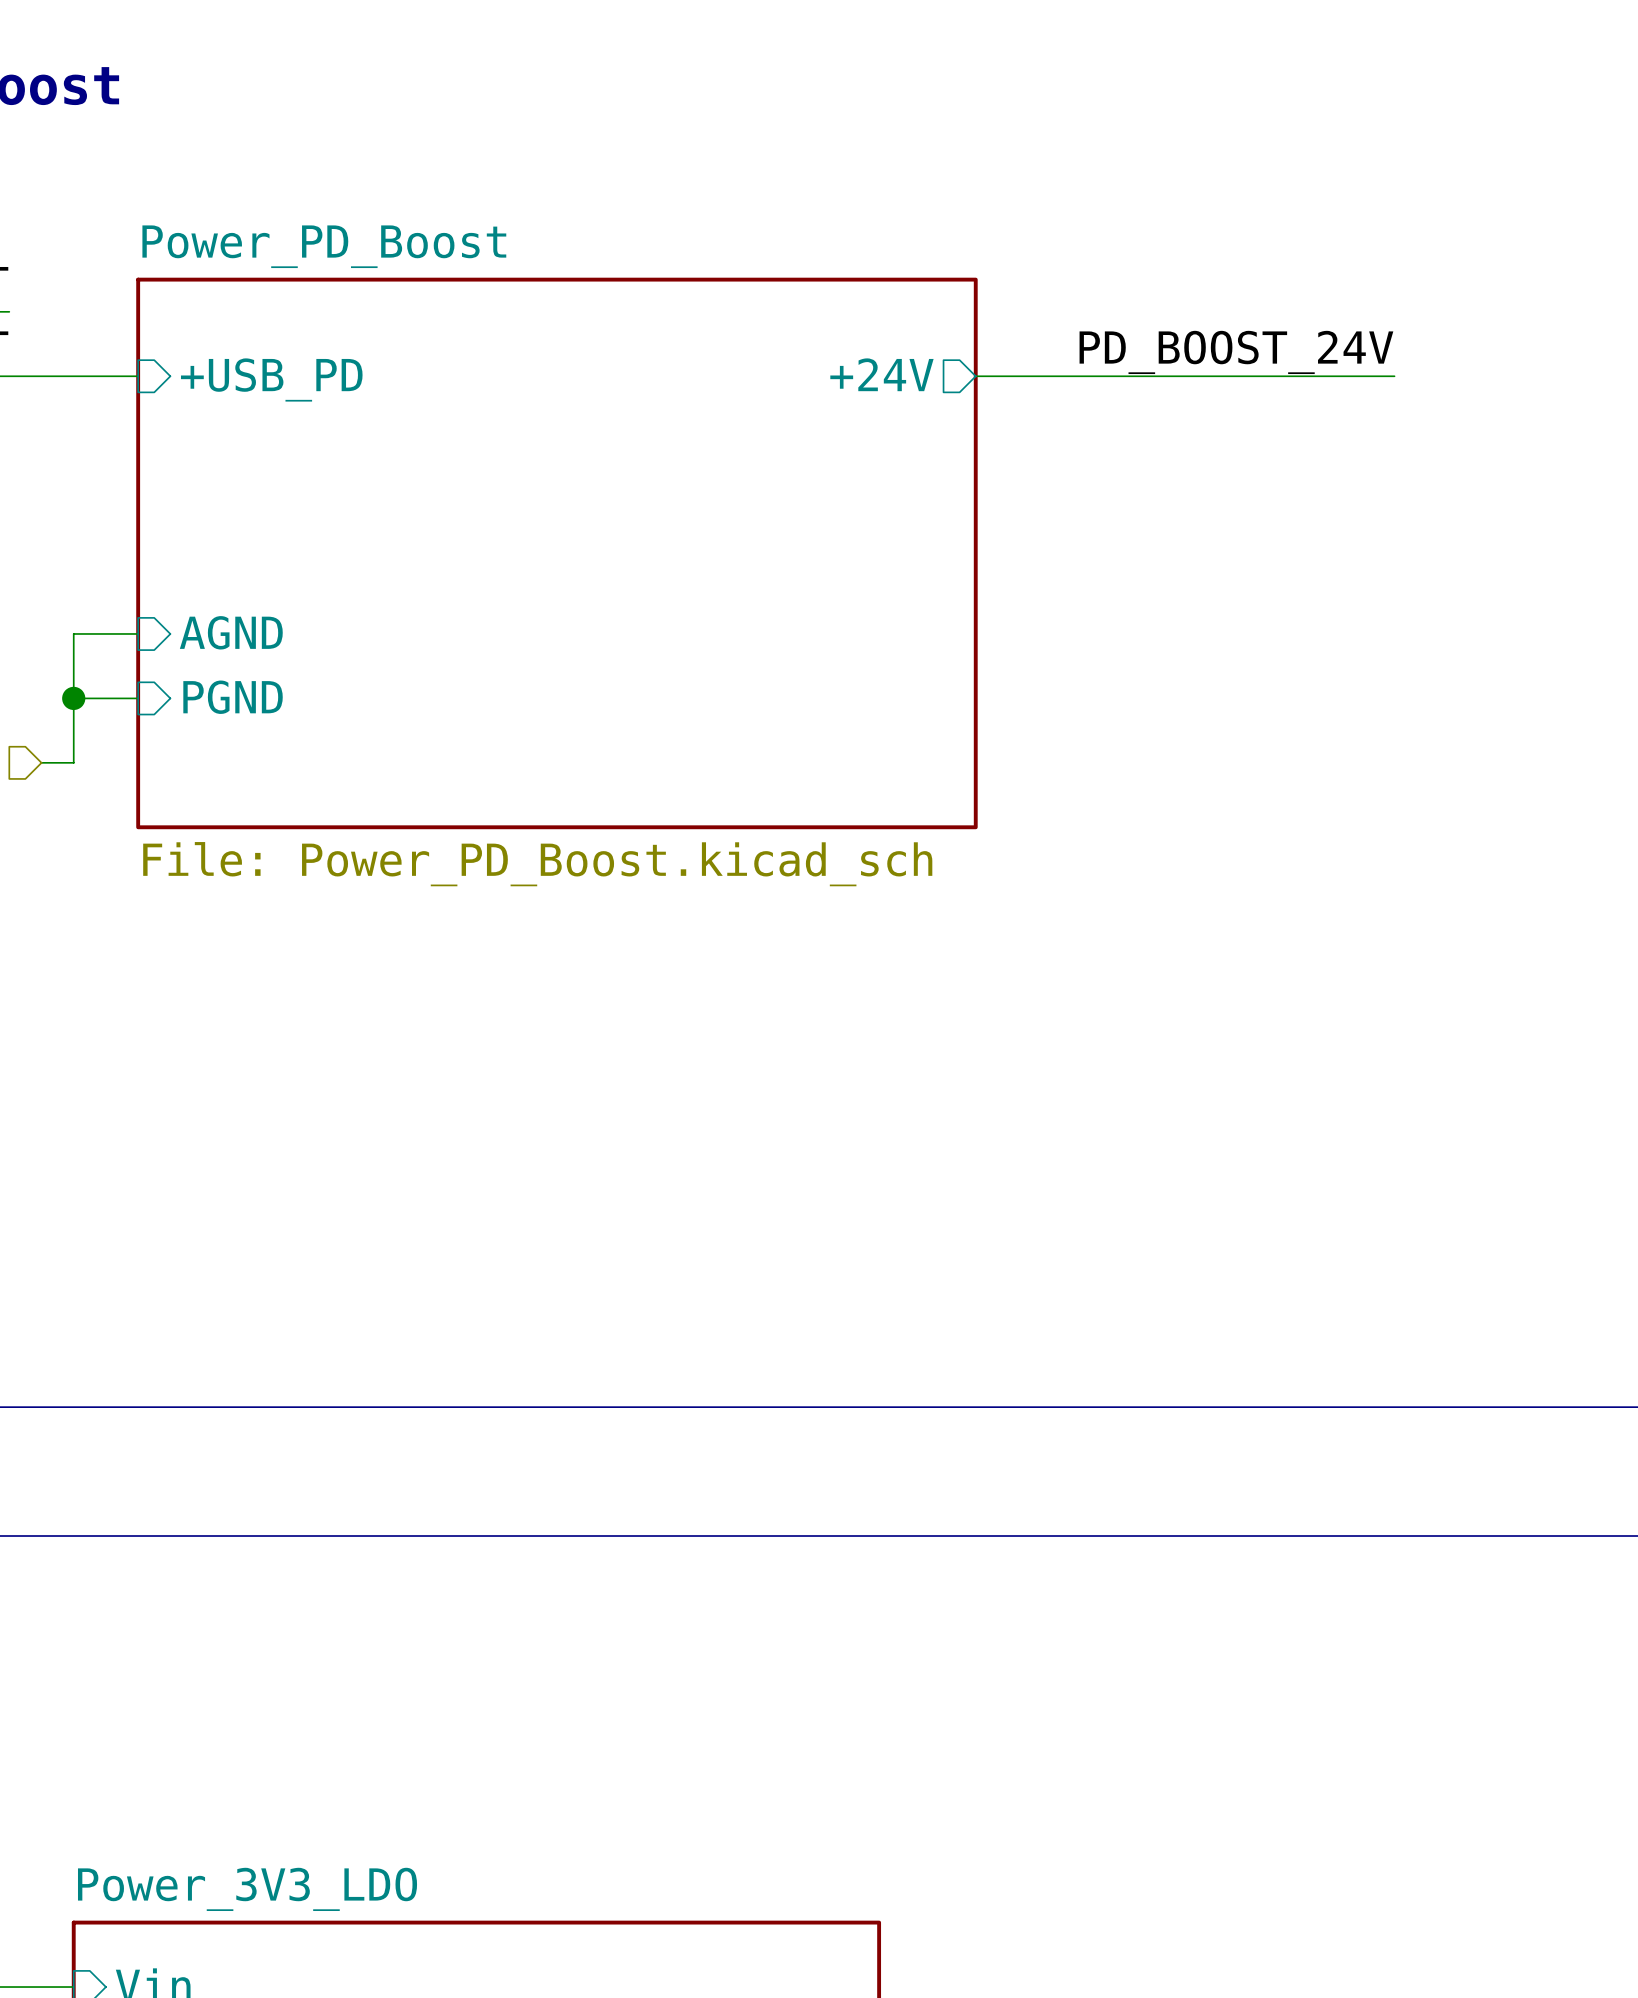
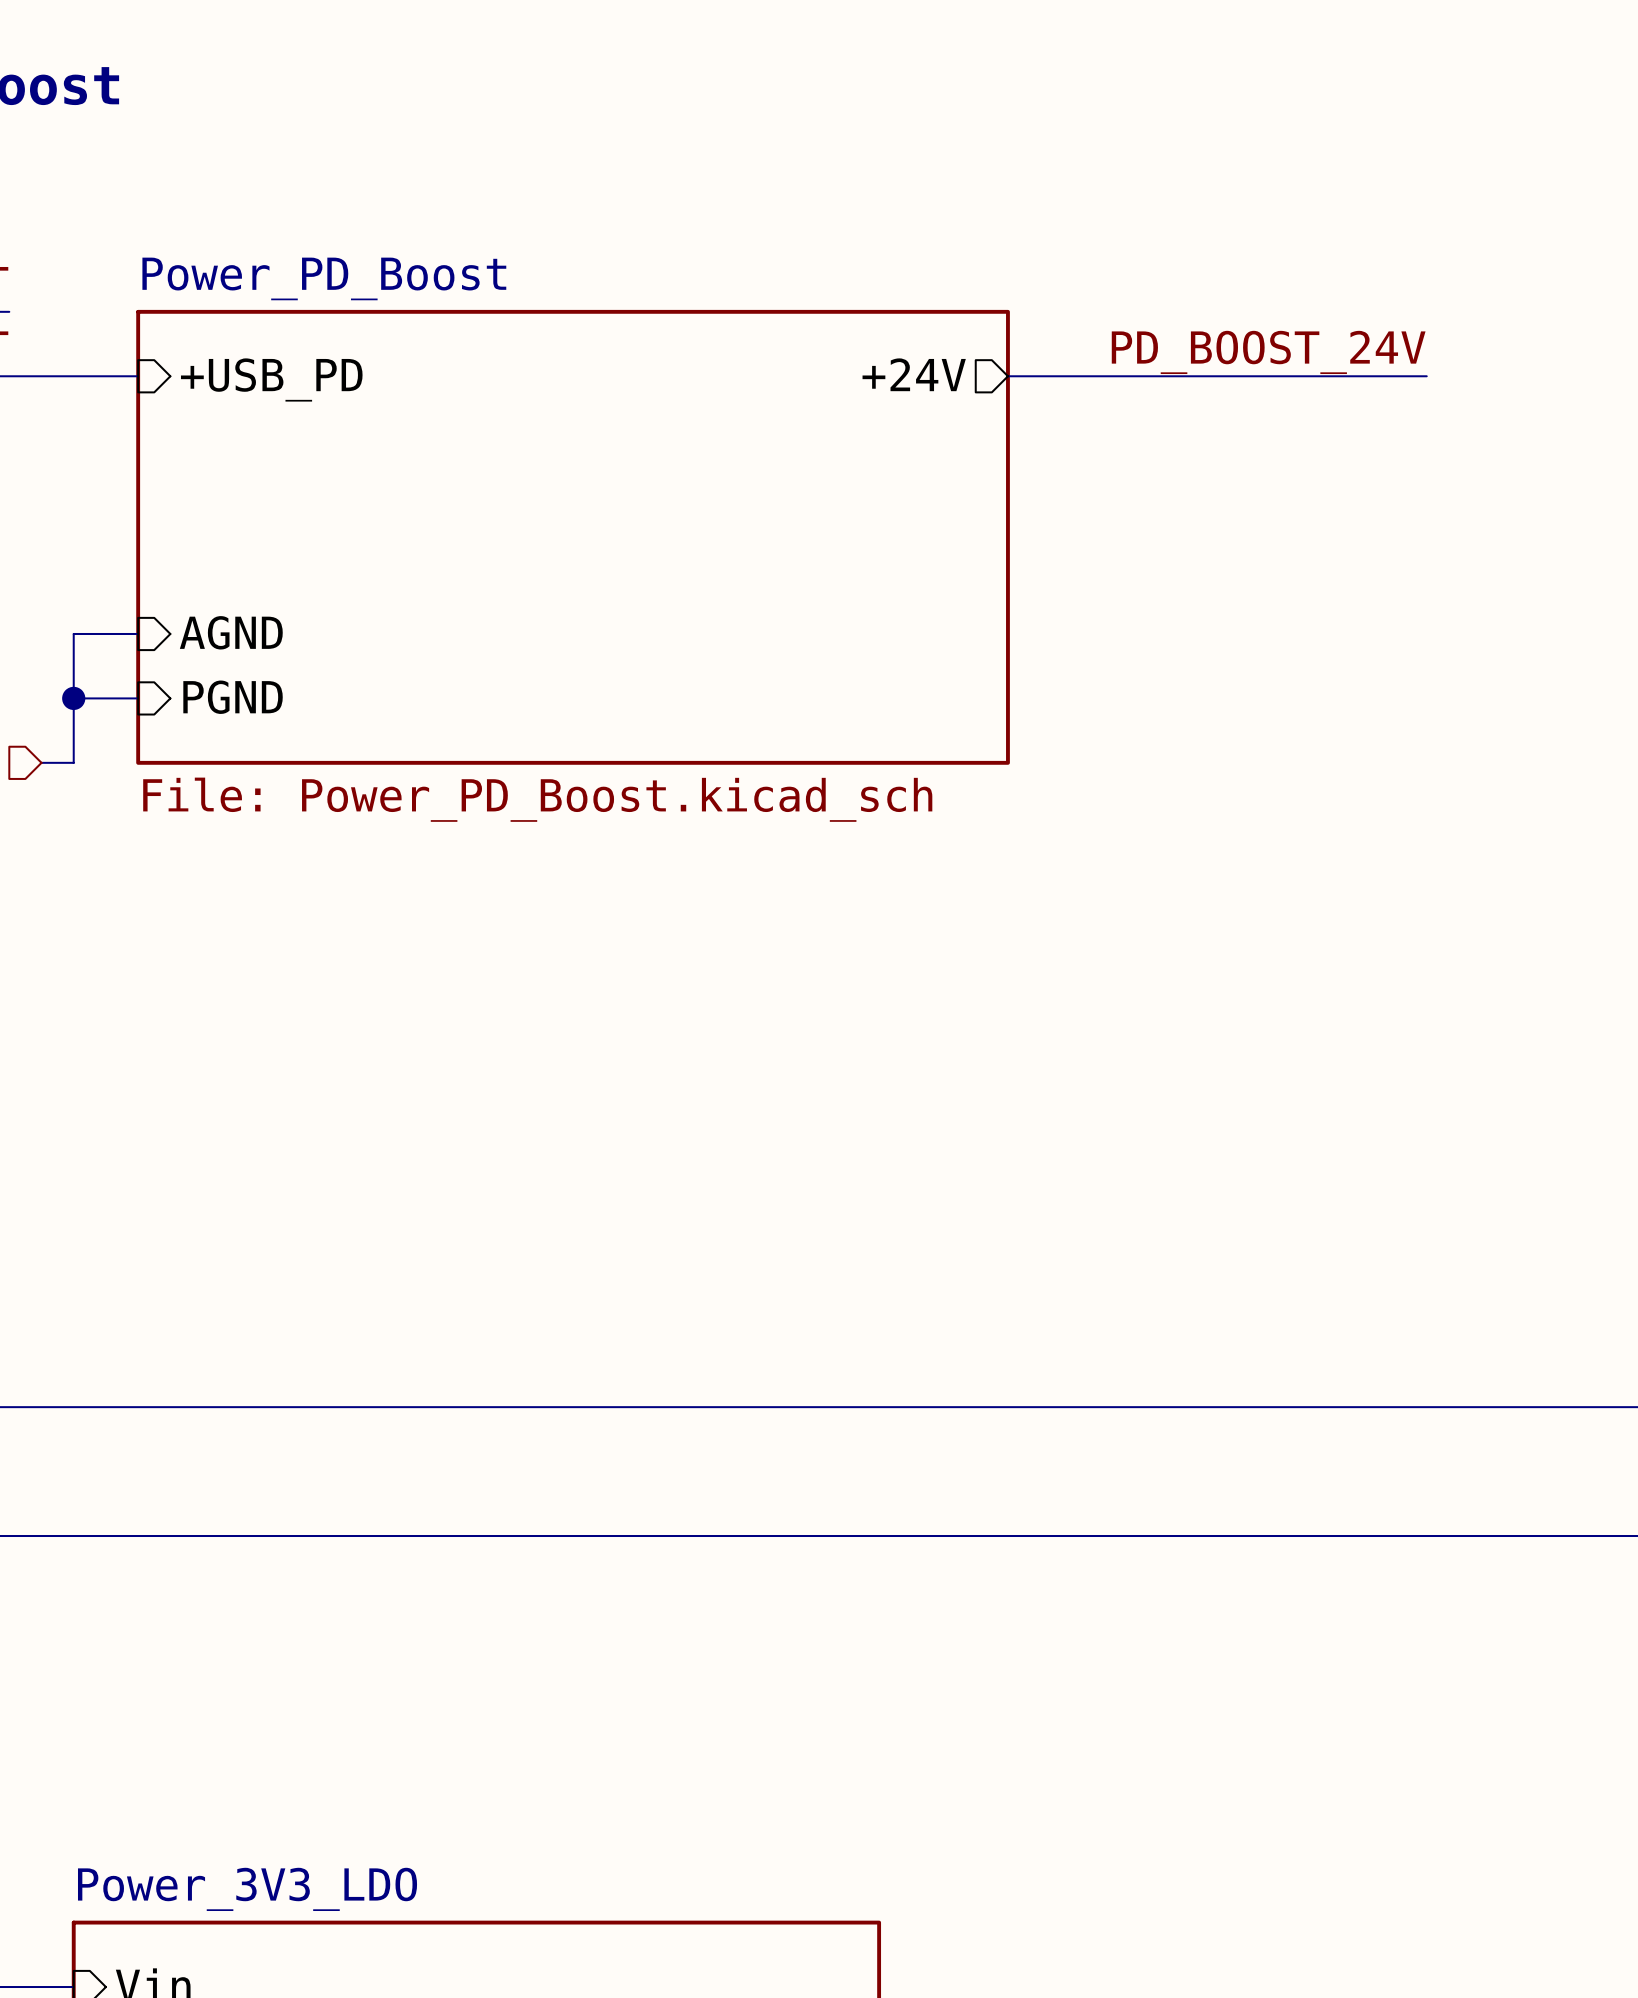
sheet Power_PD_Boost name position: Power_PD_Boost (324, 246) -> Power_PD_Boost (324, 278)
sheet Power_PD_Boost shape: [136, 277, 978, 830] -> [136, 309, 1010, 765]
label position: PD_BOOST_24V (1236, 352) -> PD_BOOST_24V (1268, 352)
sheet pin position: +24V (881, 374) -> +24V (914, 374)
wire: (975, 376) (1007, 376) -> (1394, 376) (1426, 376)
sheet Power_PD_Boost value position: File: Power_PD_Boost.kicad_sch (537, 864) -> File: Power_PD_Boost.kicad_sch (537, 799)

